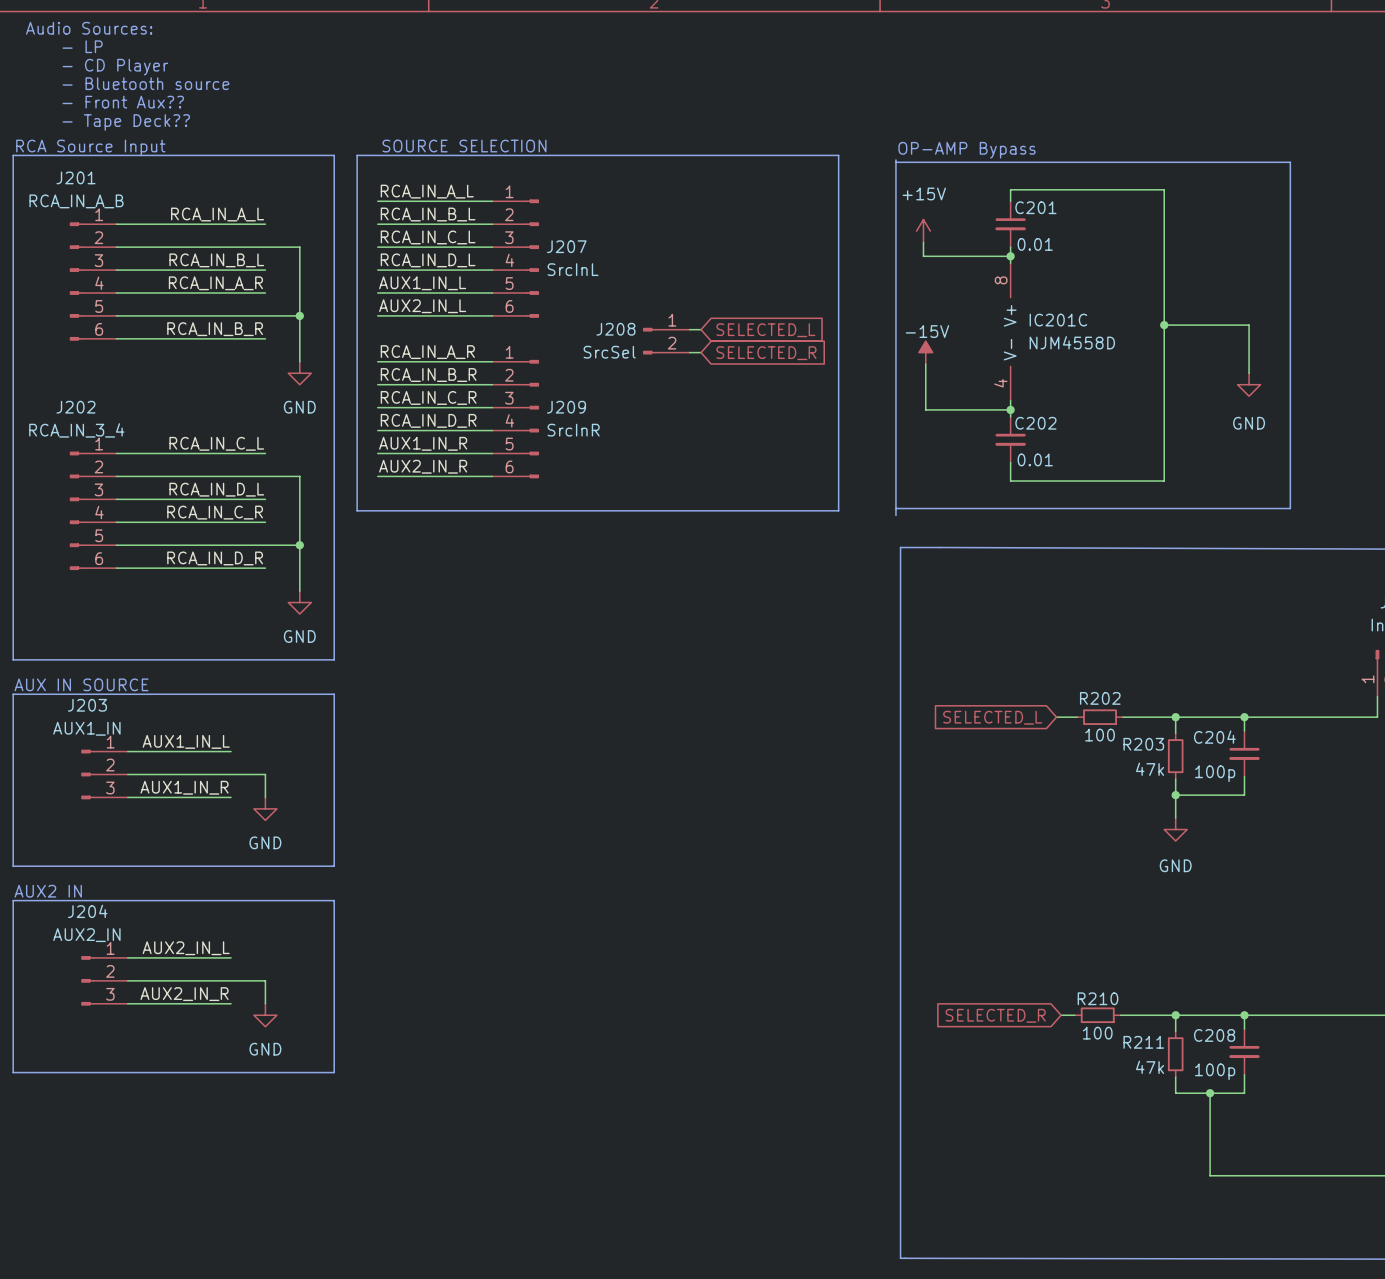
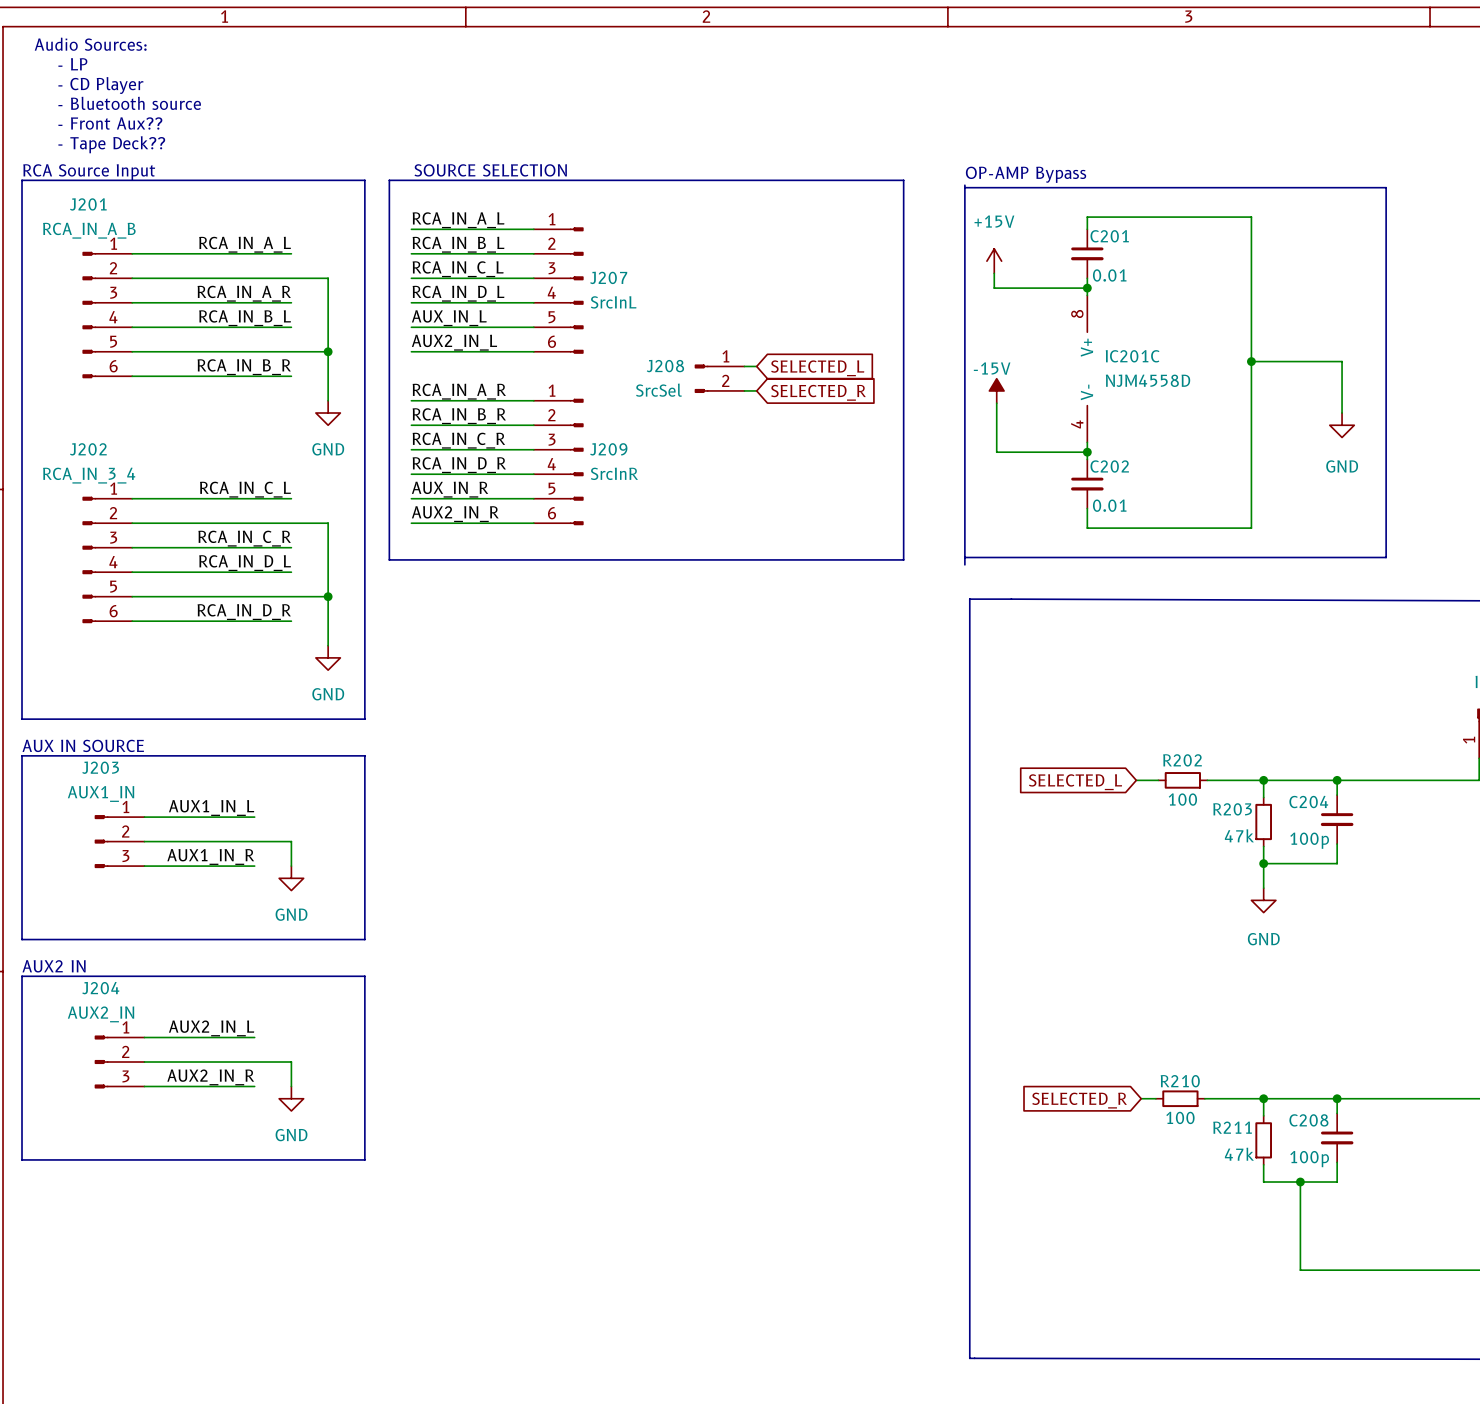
label: RCA_IN_B_L (216, 260) -> RCA_IN_A_R (244, 293)
label: RCA_IN_A_R (215, 283) -> RCA_IN_B_L (245, 318)
label: AUX1_IN_L (422, 283) -> AUX_IN_L (449, 318)
label: AUX1_IN_R (423, 443) -> AUX_IN_R (450, 489)
label: RCA_IN_D_L (216, 489) -> RCA_IN_C_R (244, 538)
label: RCA_IN_C_R (215, 512) -> RCA_IN_D_L (245, 563)

